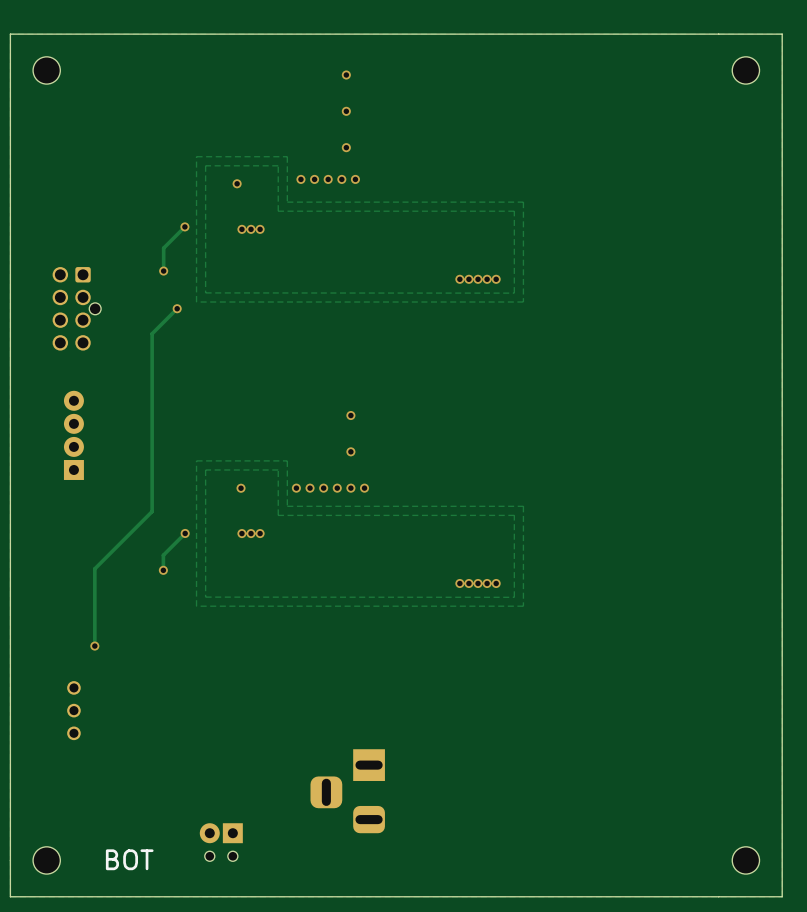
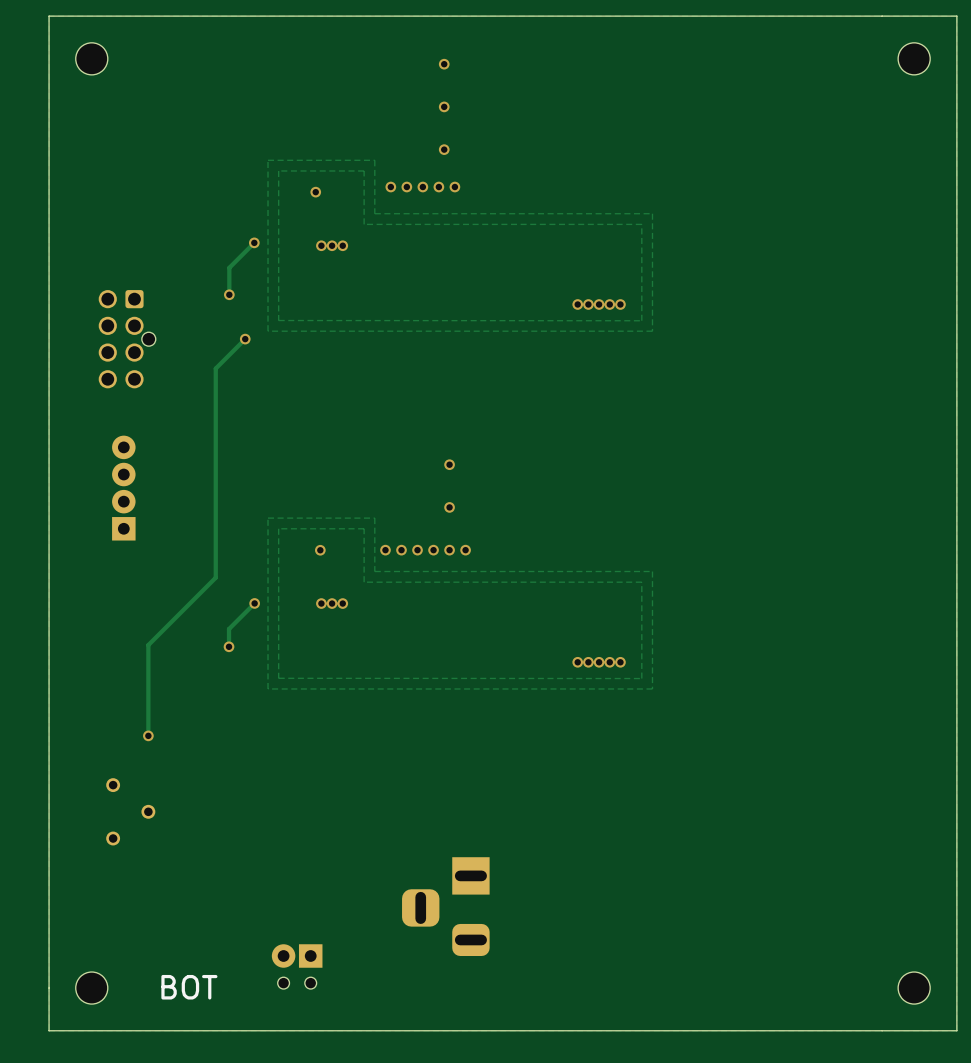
part footprint: [67, 681, 81, 741] -> [106, 778, 156, 846]

